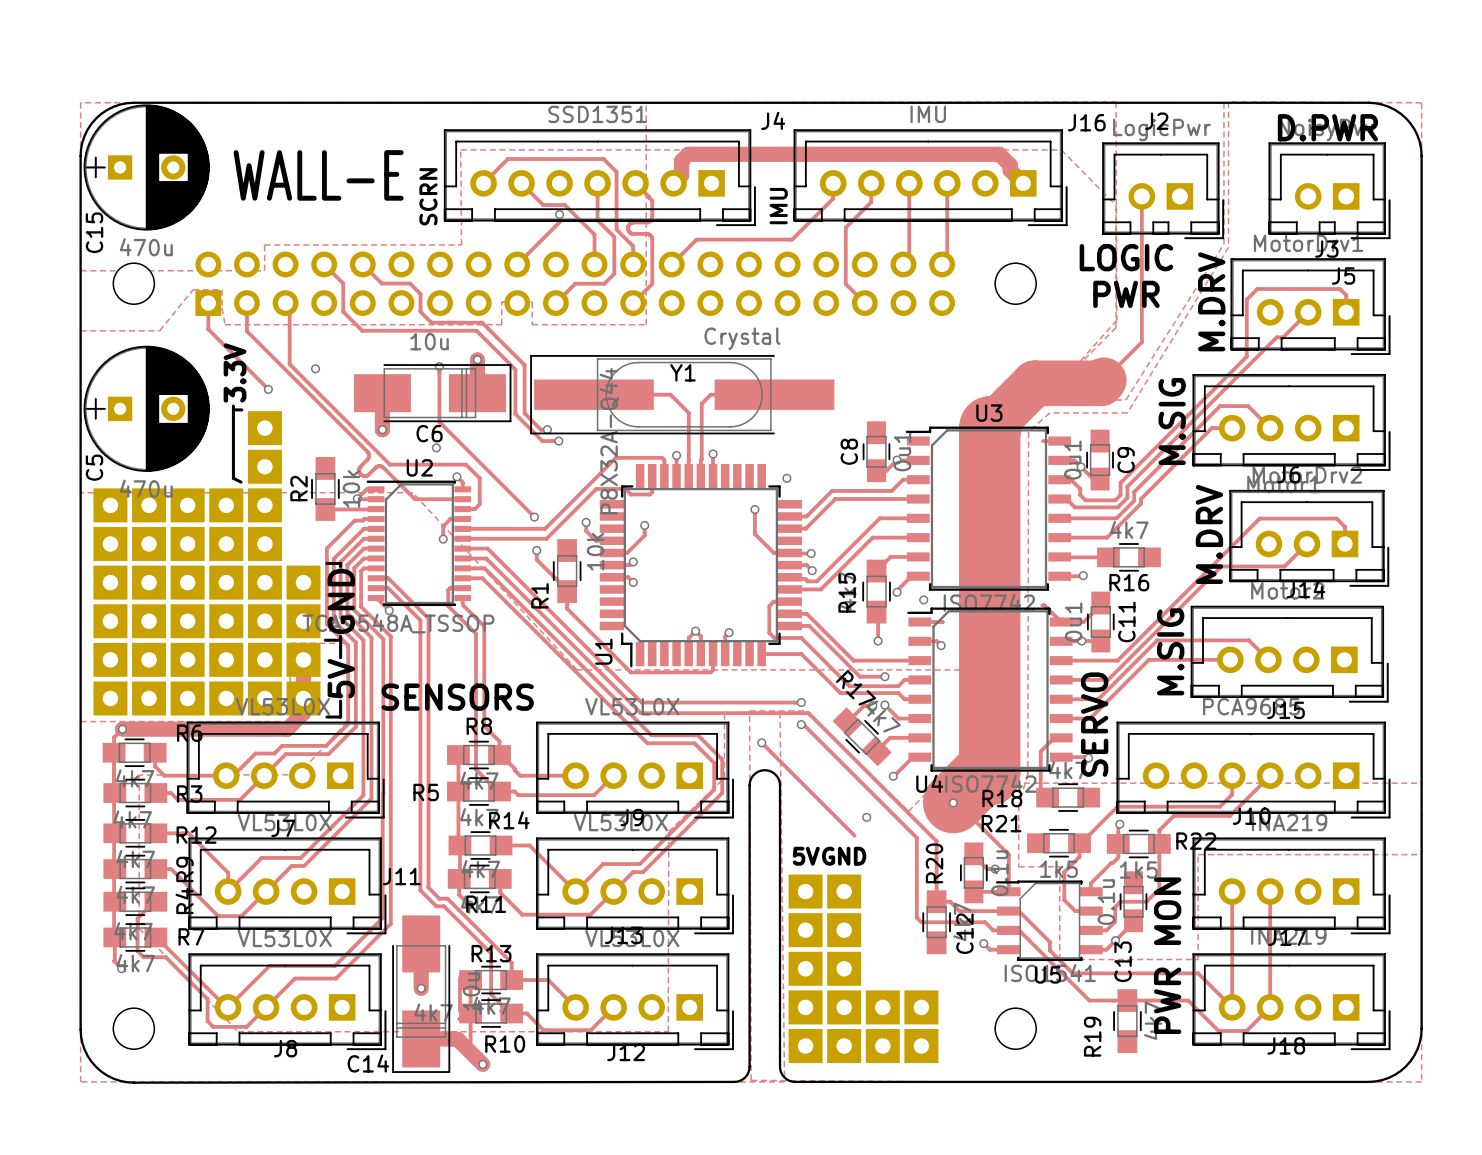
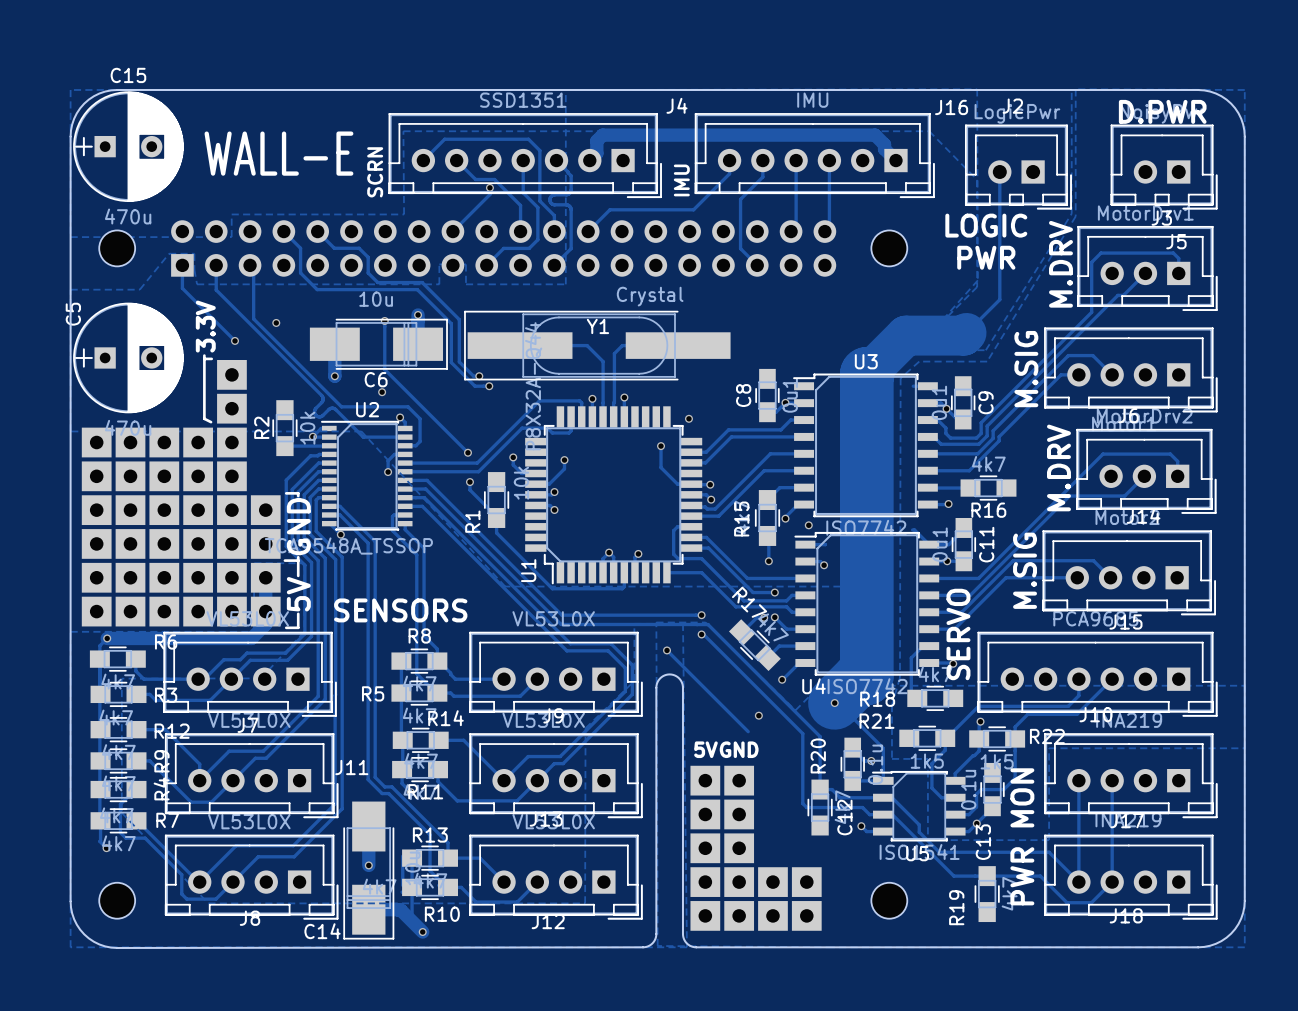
C15 name rotation: 0° (94, 232) -> 90° clockwise (128, 75)
C15 name position: C15 (94, 232) -> C15 (128, 75)
C5 name position: C5 (94, 467) -> C5 (73, 314)

